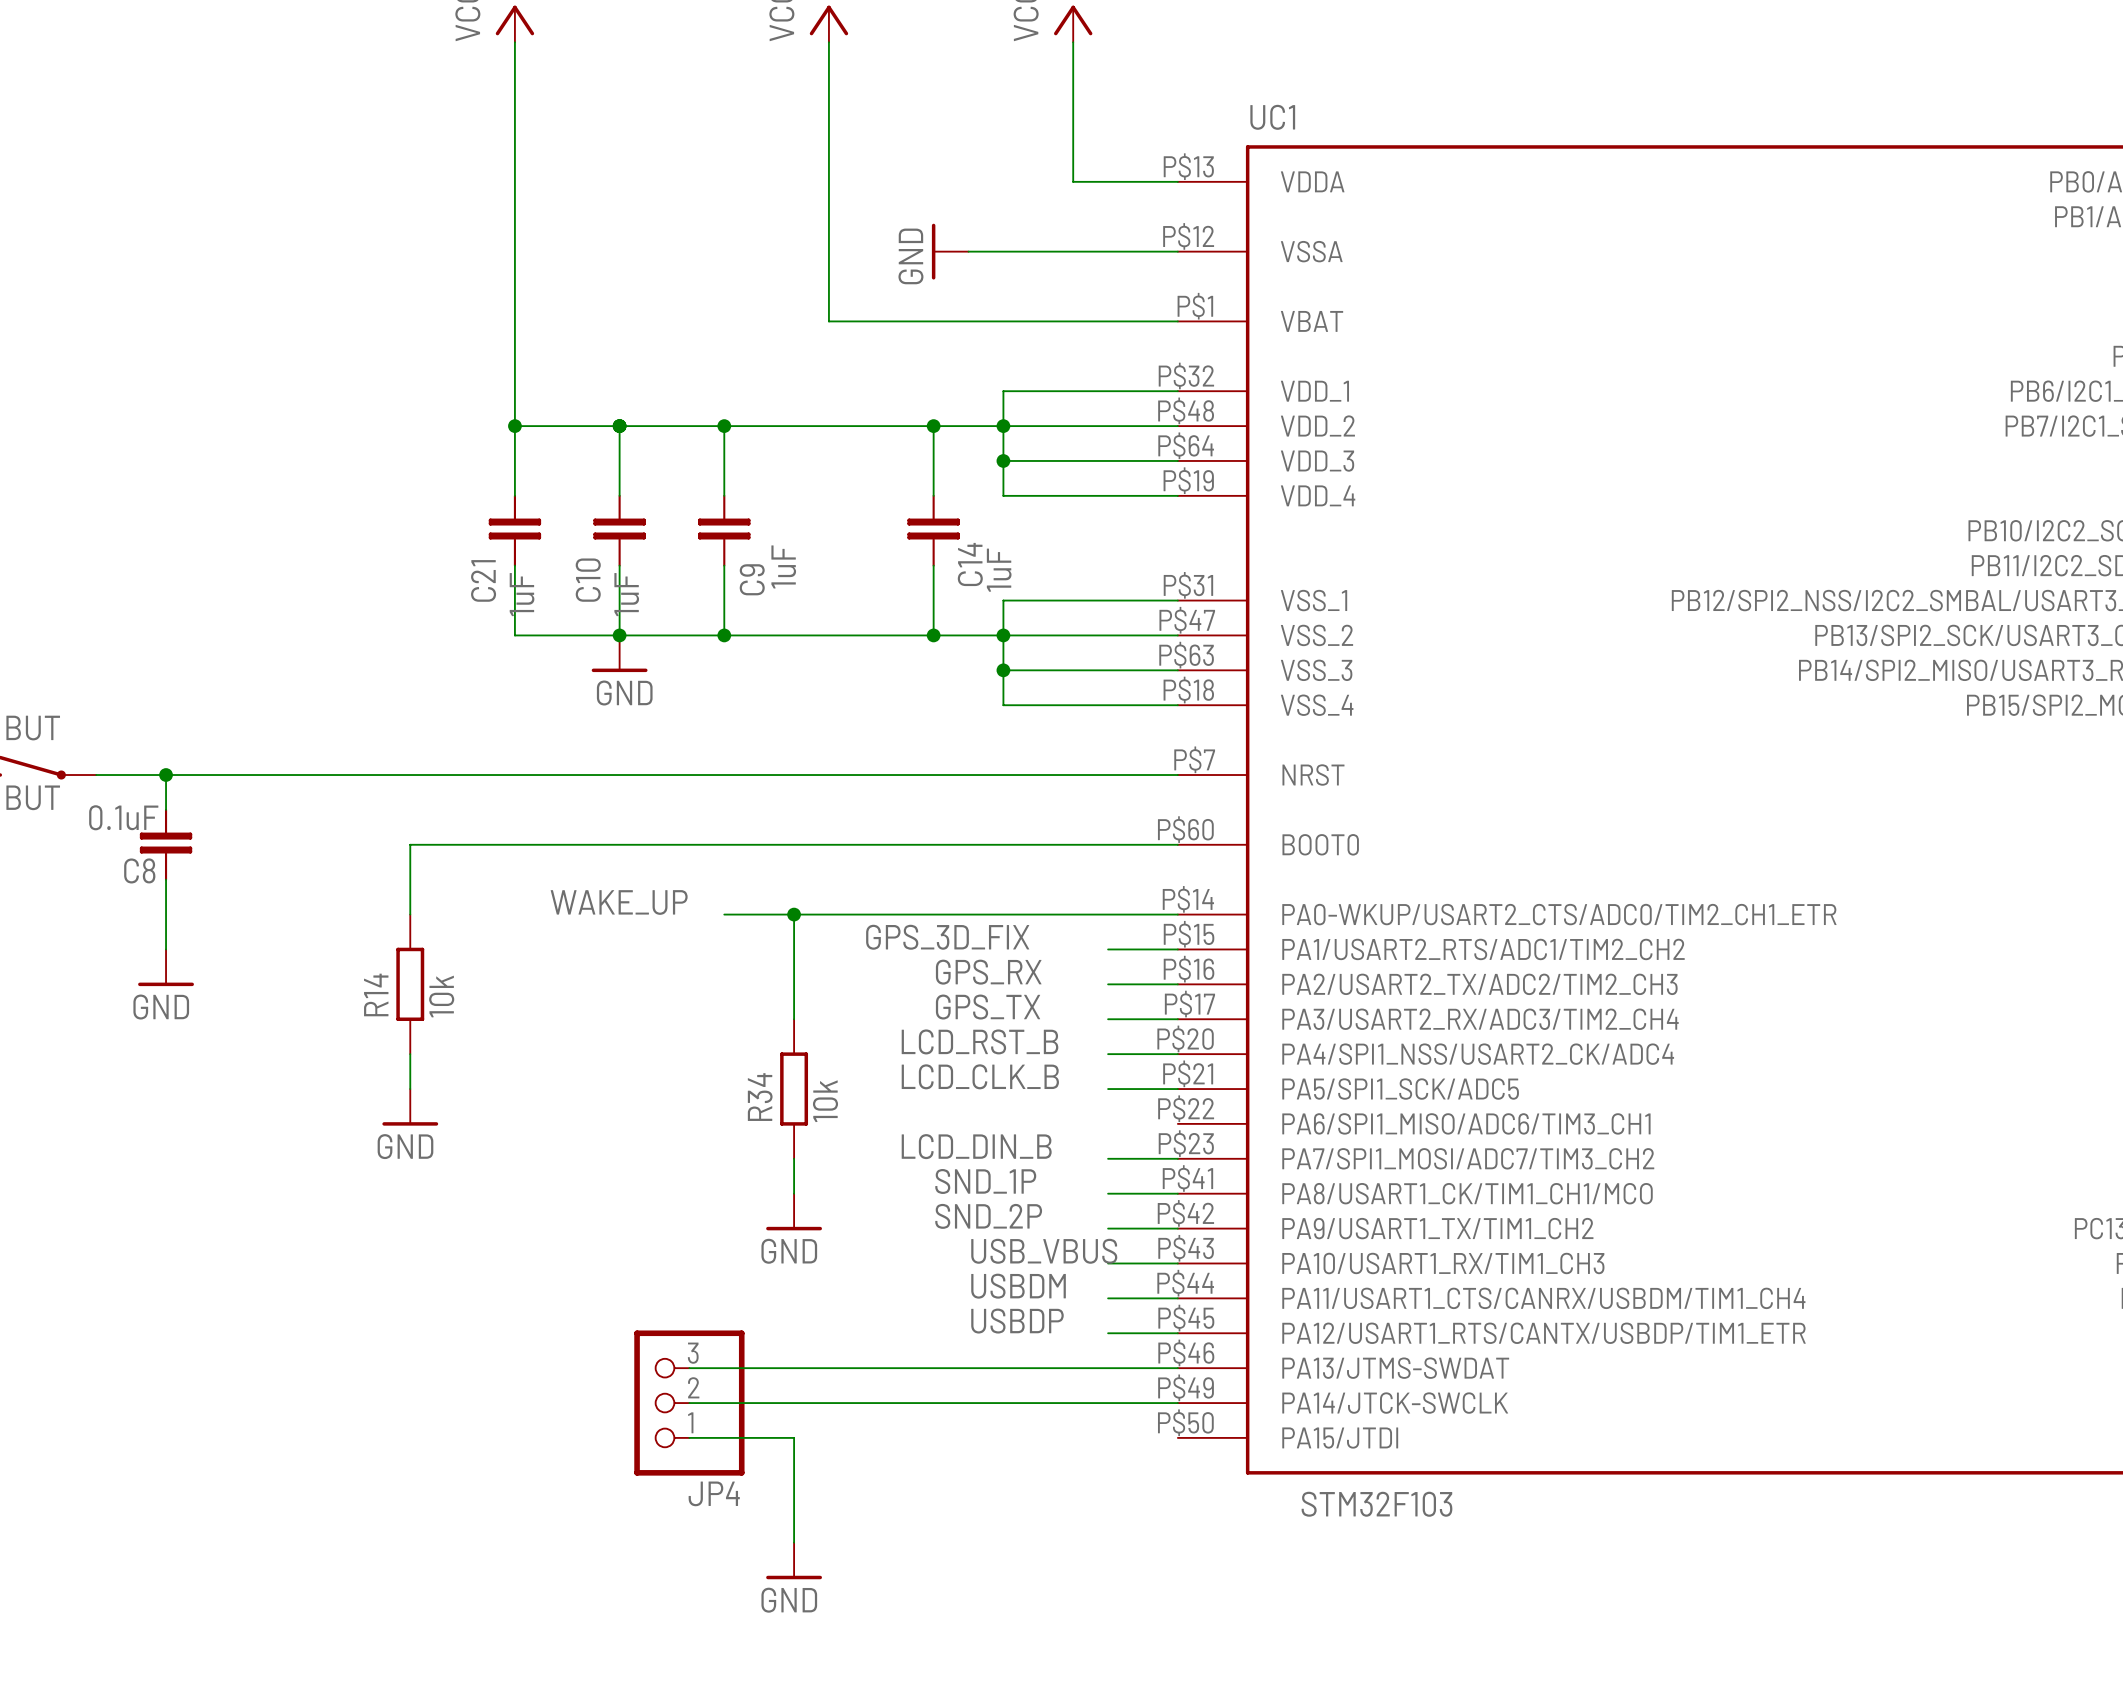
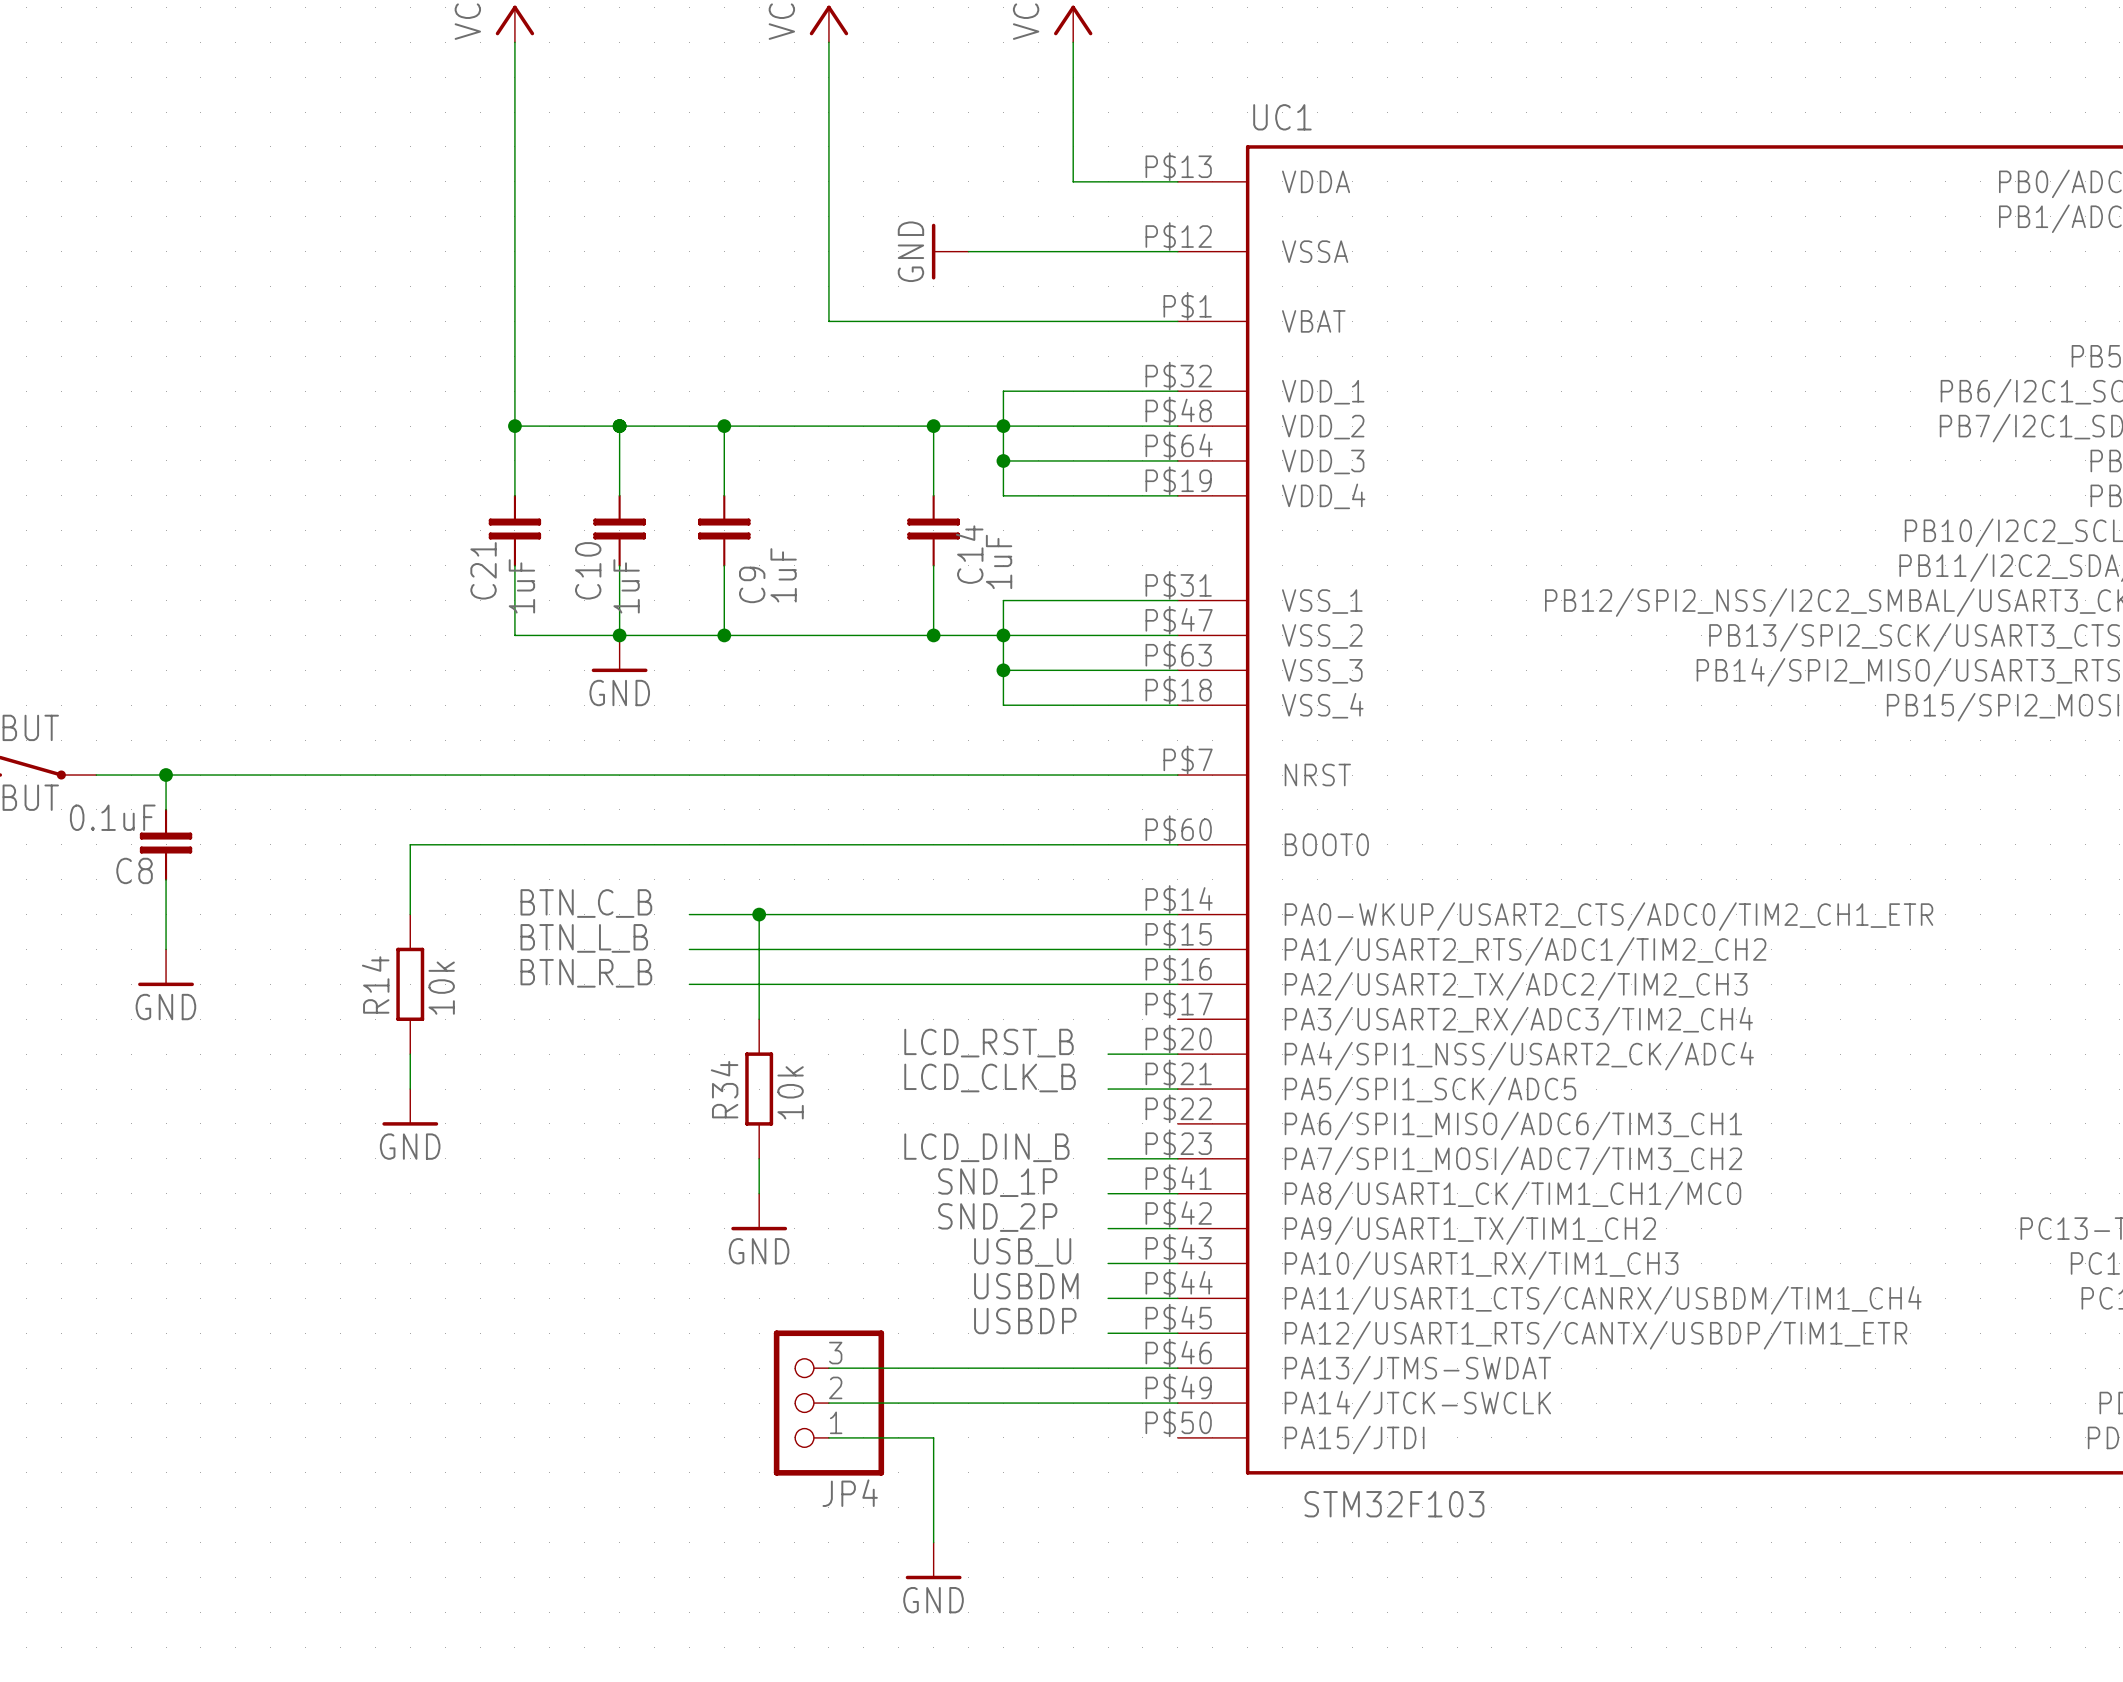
label: none -> BTN_C_B (586, 903)
label: WAKE_UP (619, 902) -> none
wire: none -> (689, 914) (724, 914)
wire: (794, 914) (794, 1019) -> (759, 914) (759, 1019)
junction position: (794, 914) -> (759, 914)
label: none -> BTN_L_B (584, 938)
label: GPS_3D_FIX (947, 937) -> none
wire: none -> (689, 949) (1108, 949)
label: none -> BTN_R_B (586, 973)
label: GPS_RX (988, 972) -> none
wire: none -> (689, 984) (1108, 984)
label: GPS_TX (988, 1007) -> none
wire: (1108, 1019) (1177, 1019) -> none
R34 position: (794, 1089) -> (759, 1089)
wire: (794, 1158) (794, 1193) -> (759, 1158) (759, 1193)
power symbol position: GND (794, 1212) -> GND (759, 1212)
label: USB_VBUS (1044, 1251) -> USB_U (1022, 1252)
wire: (689, 1368) (828, 1368) -> none
wire: (689, 1403) (828, 1403) -> none
JP4 position: (689, 1403) -> (828, 1403)
wire: (689, 1437) (794, 1437) (794, 1542) -> (828, 1437) (933, 1437) (933, 1542)
power symbol position: GND (794, 1560) -> GND (933, 1560)

